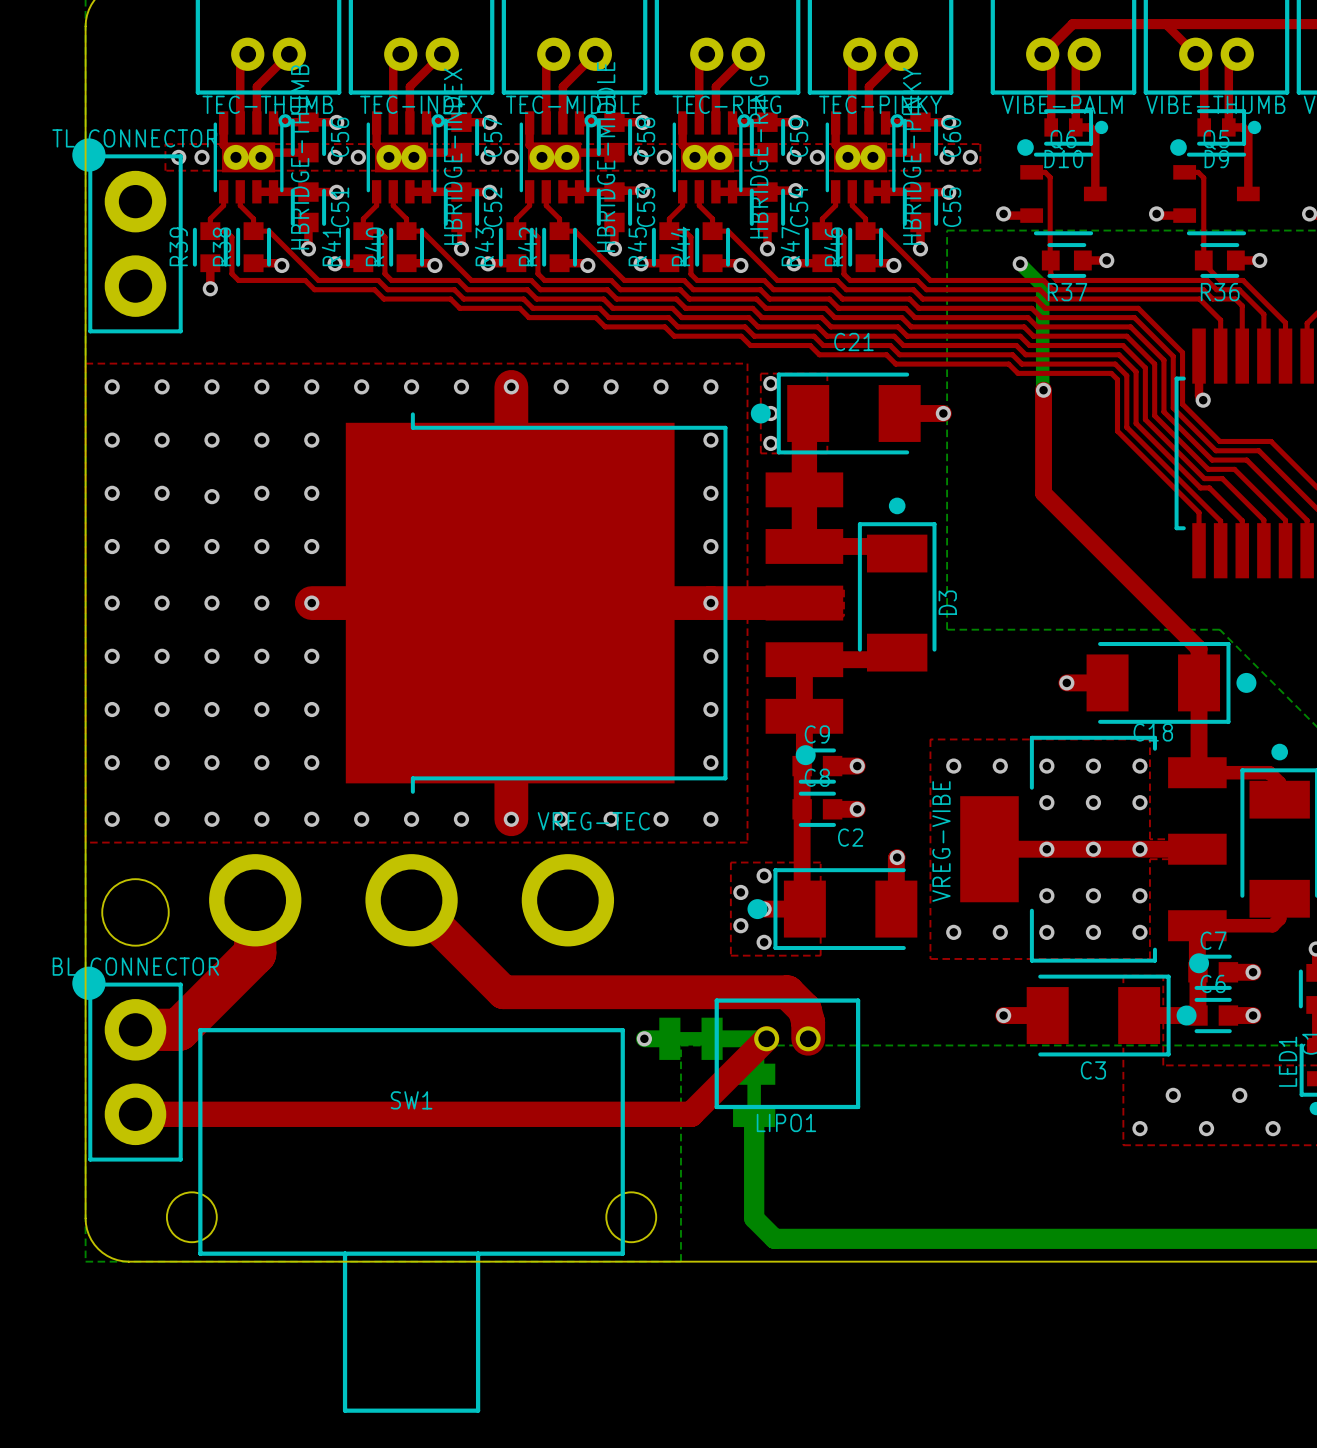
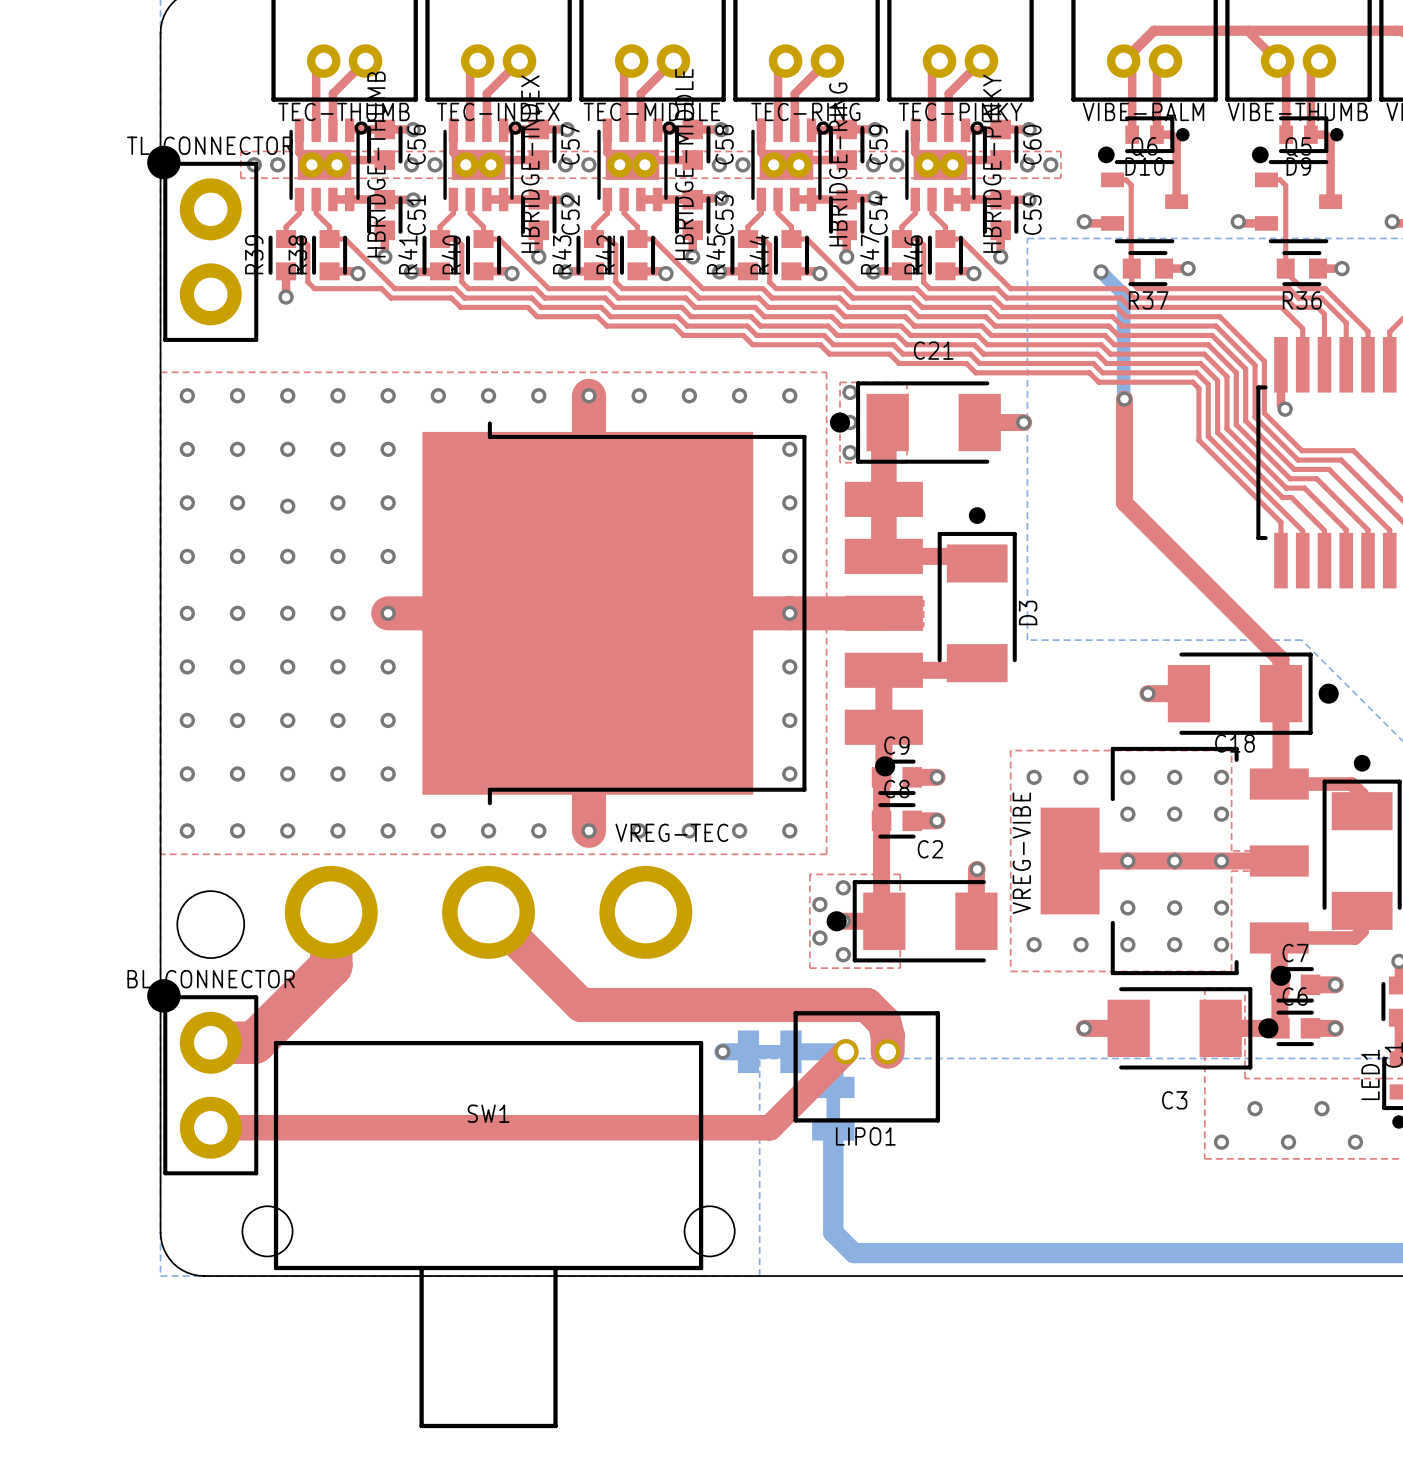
C3 name position: C3 (1093, 1070) -> C3 (1174, 1100)

